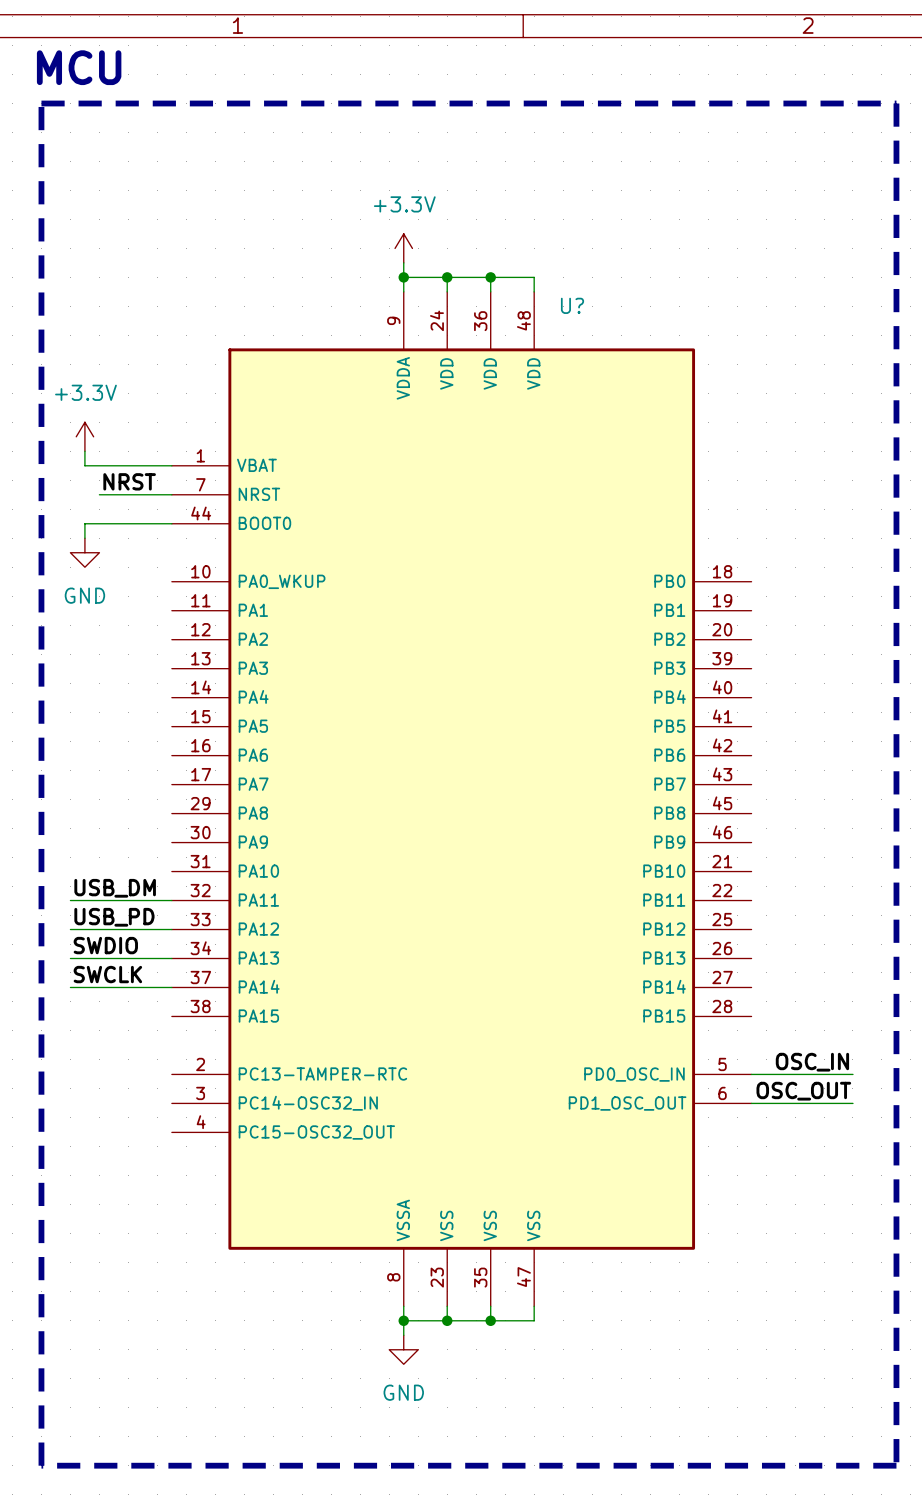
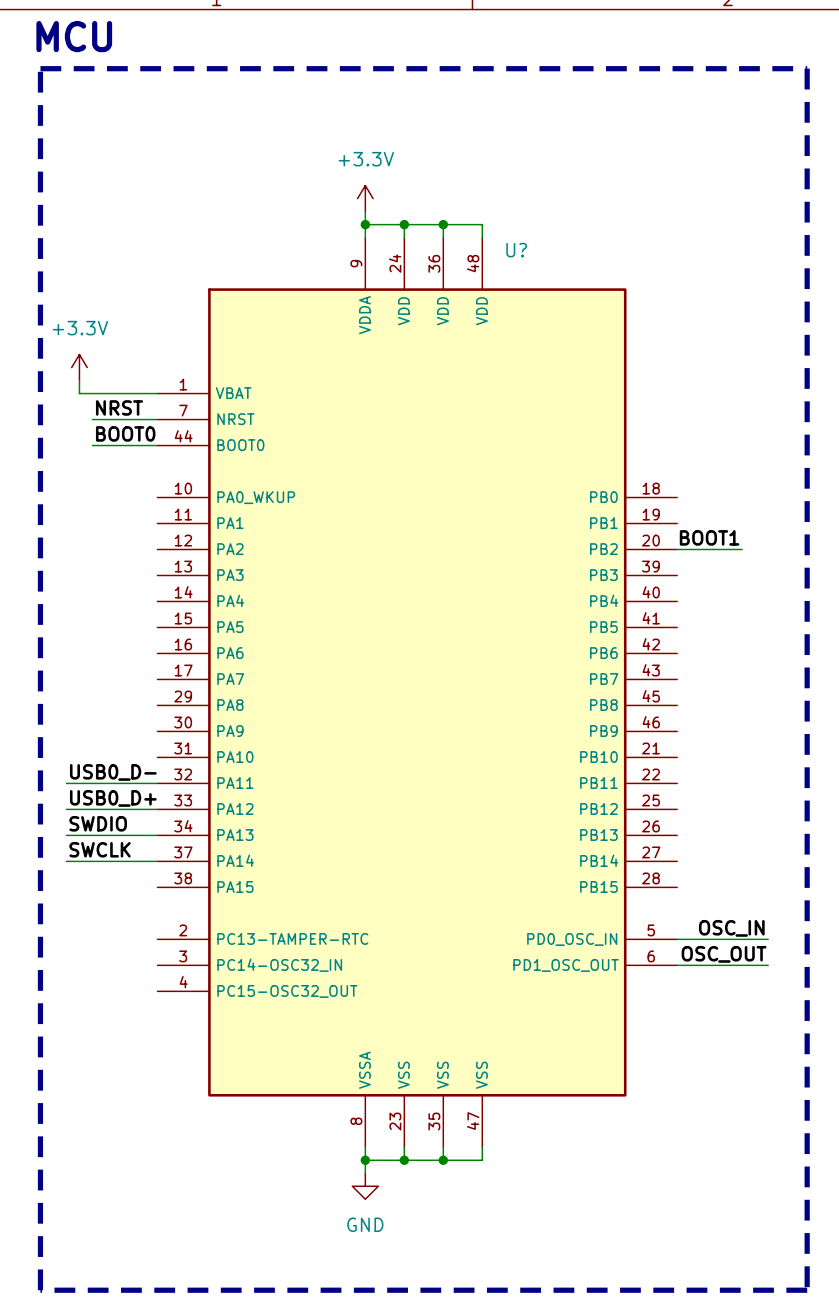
label: none -> BOOT0 (125, 433)
wire: (99, 523) (84, 523) (84, 538) -> none
power symbol: GND (84, 552) -> none
label: none -> BOOT1 (709, 537)
wire: none -> (677, 549) (742, 549)
label: USB_DM (115, 888) -> USB0_D- (113, 772)
label: USB_PD (114, 917) -> USB0_D+ (113, 798)

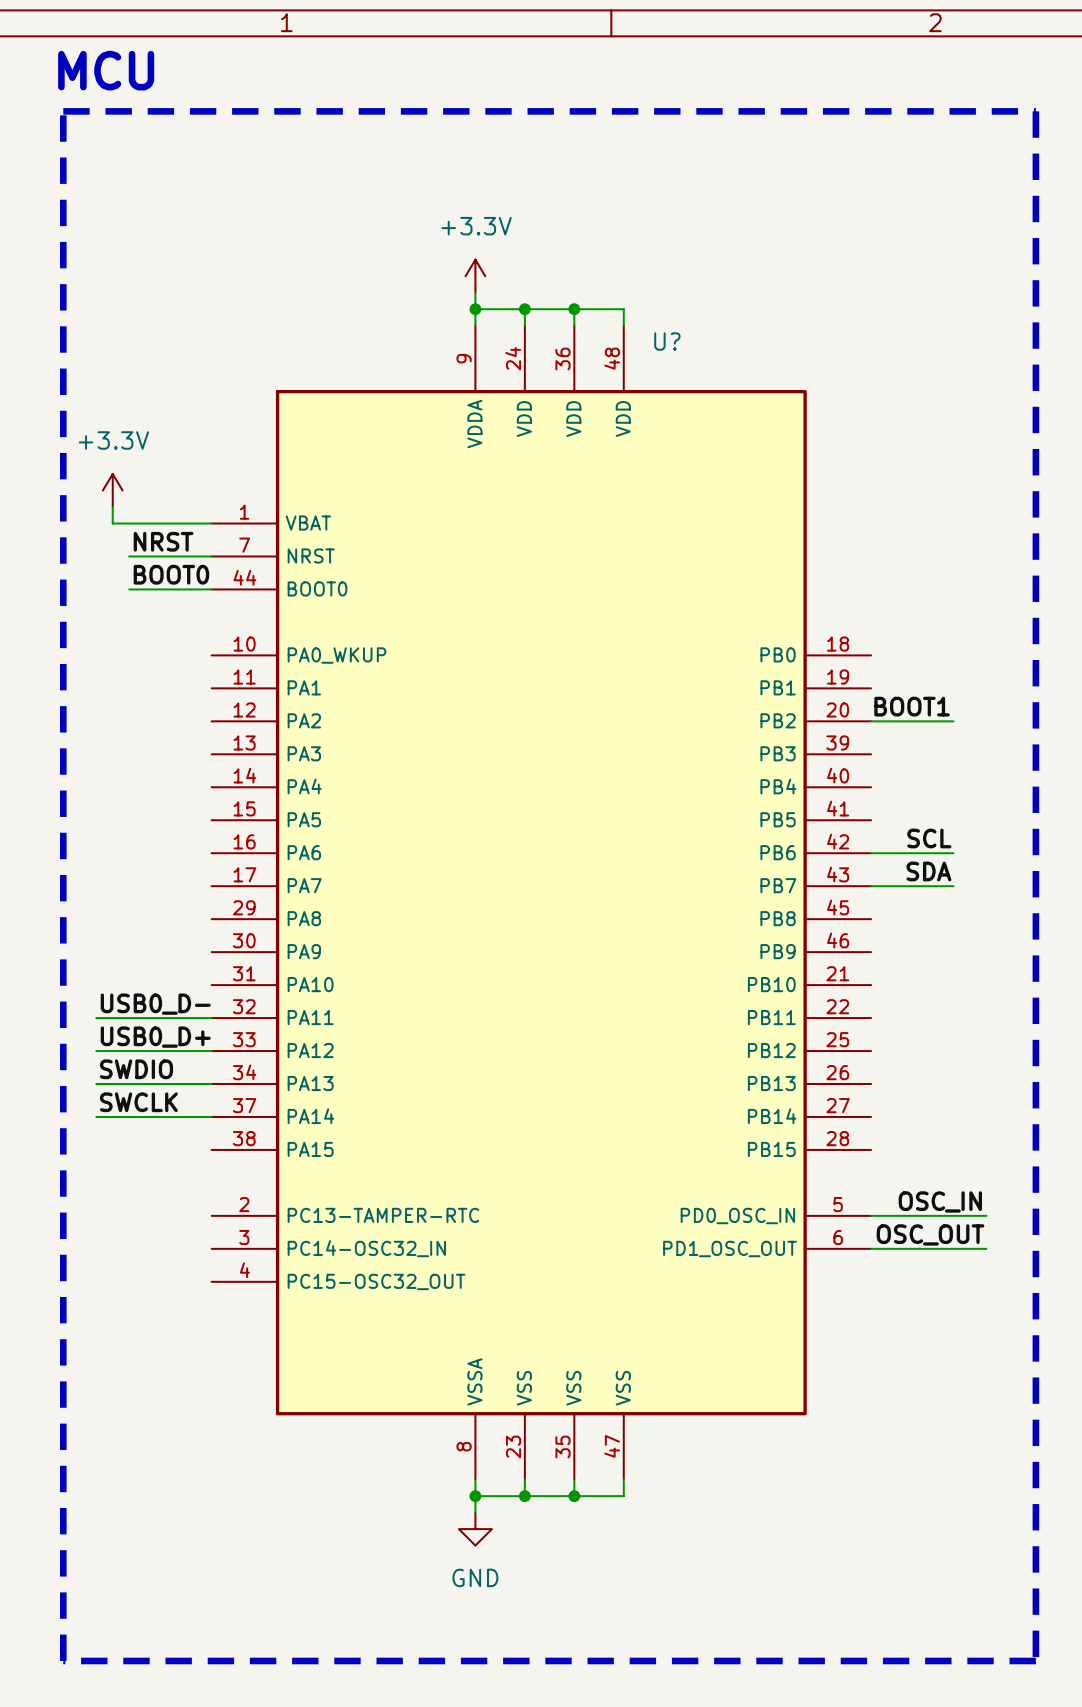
label: none -> SCL (929, 838)
wire: none -> (871, 853) (953, 853)
label: none -> SDA (928, 871)
wire: none -> (871, 886) (953, 886)

